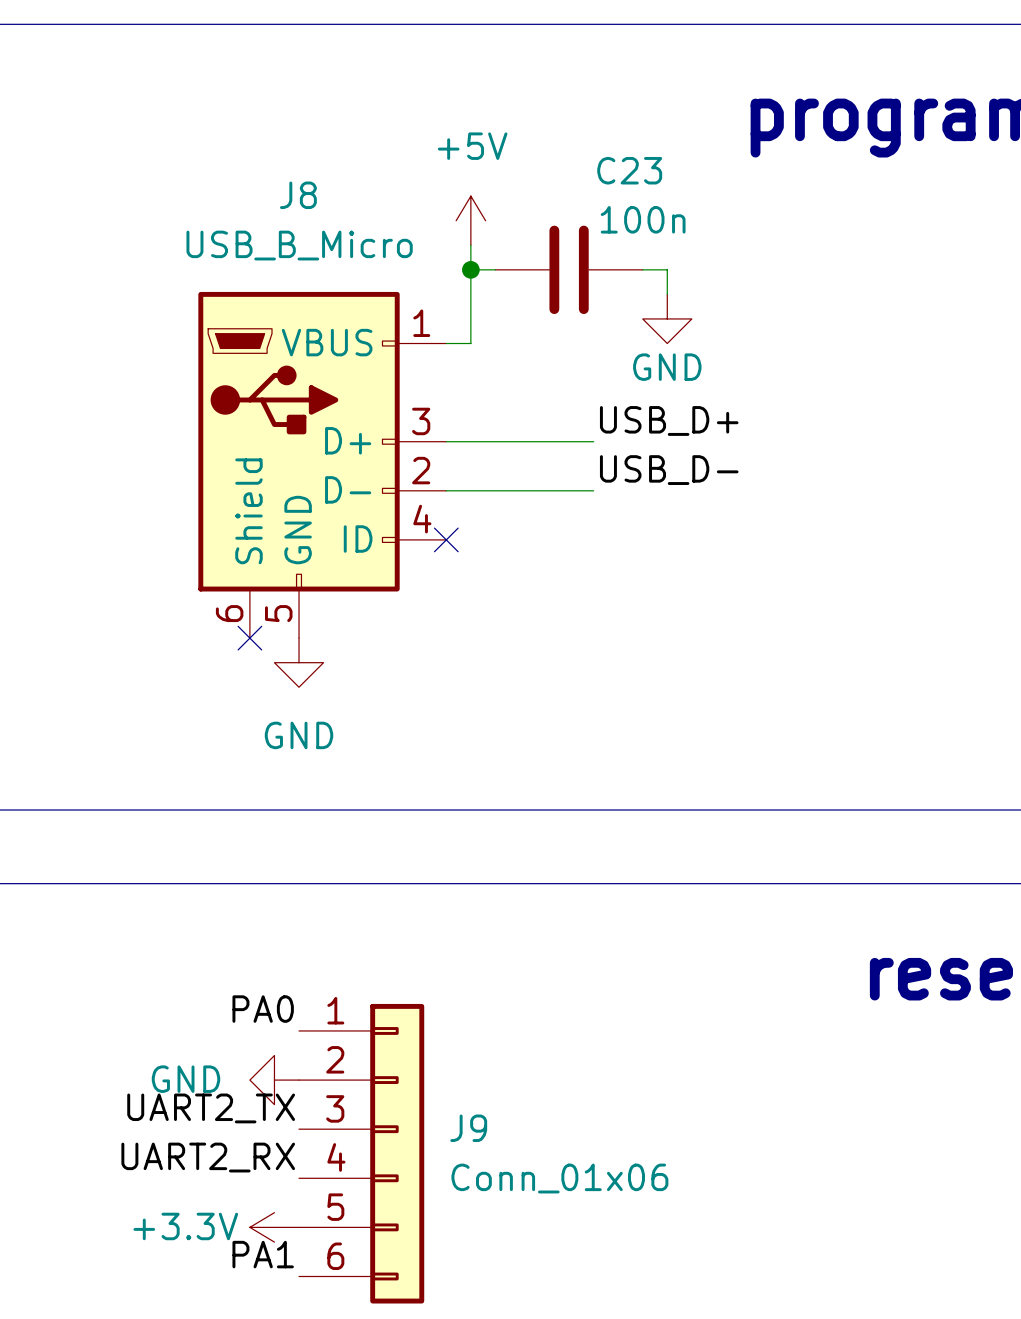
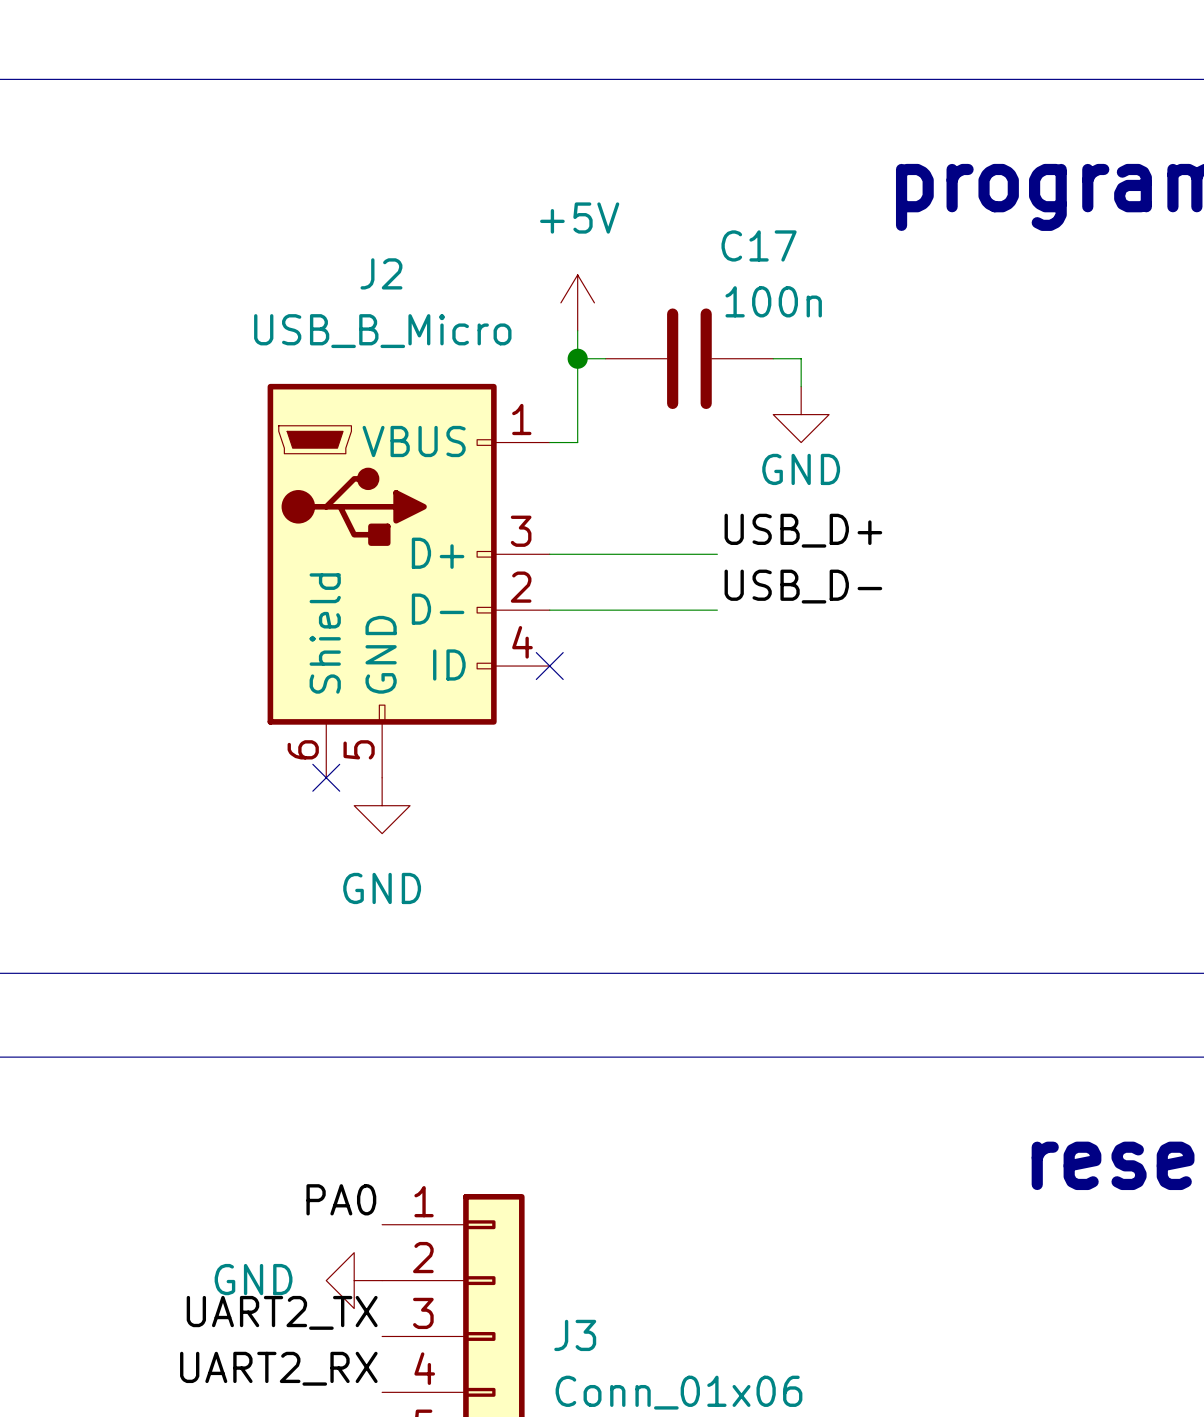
C23 name: C23 (629, 170) -> C17 (759, 245)
J8 name: J8 (298, 195) -> J2 (381, 273)
J9 name: J9 (468, 1128) -> J3 (575, 1335)

